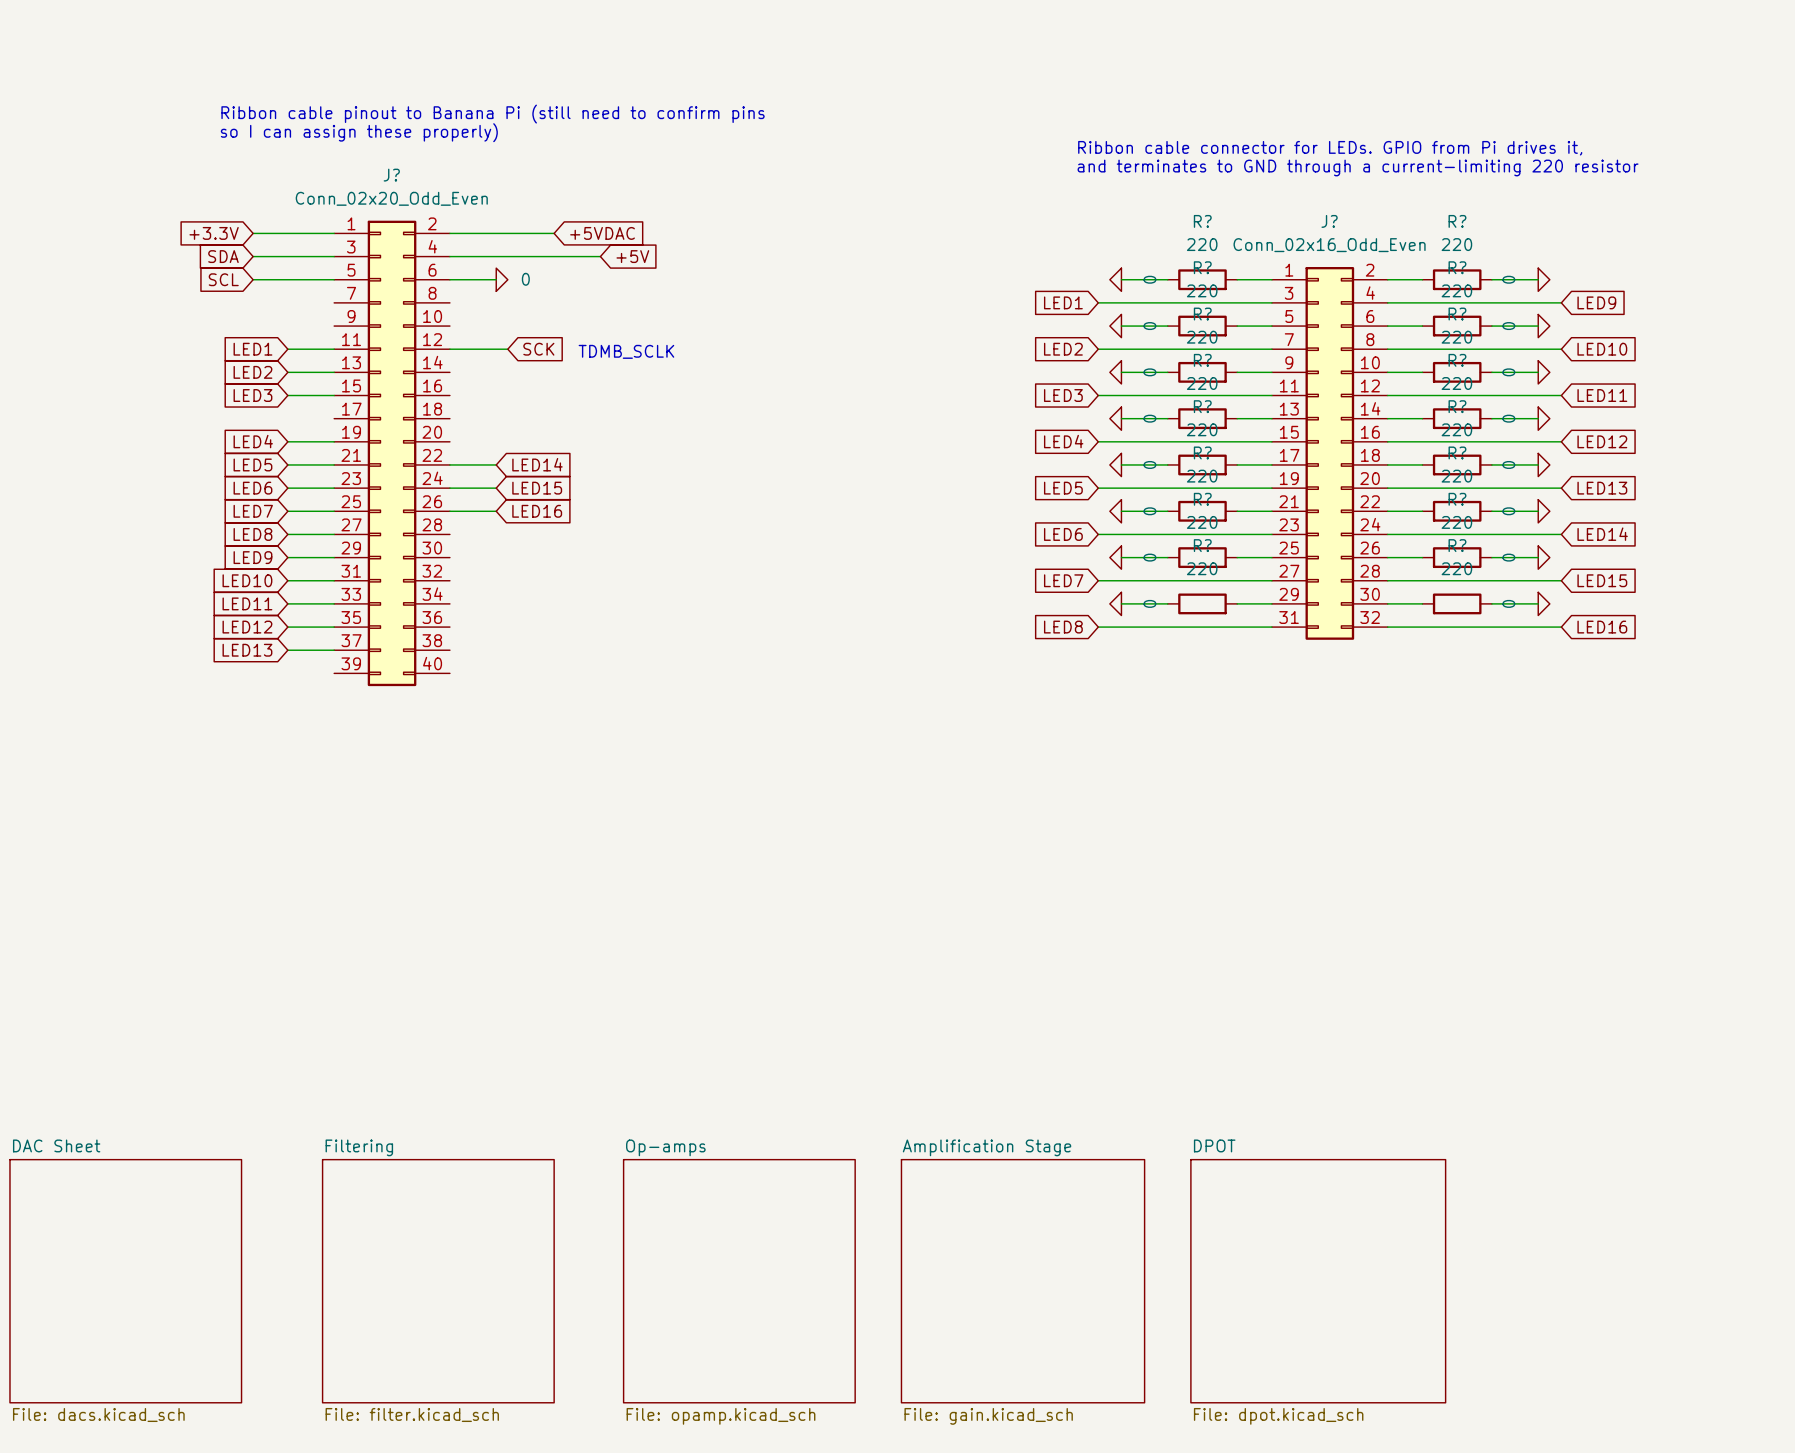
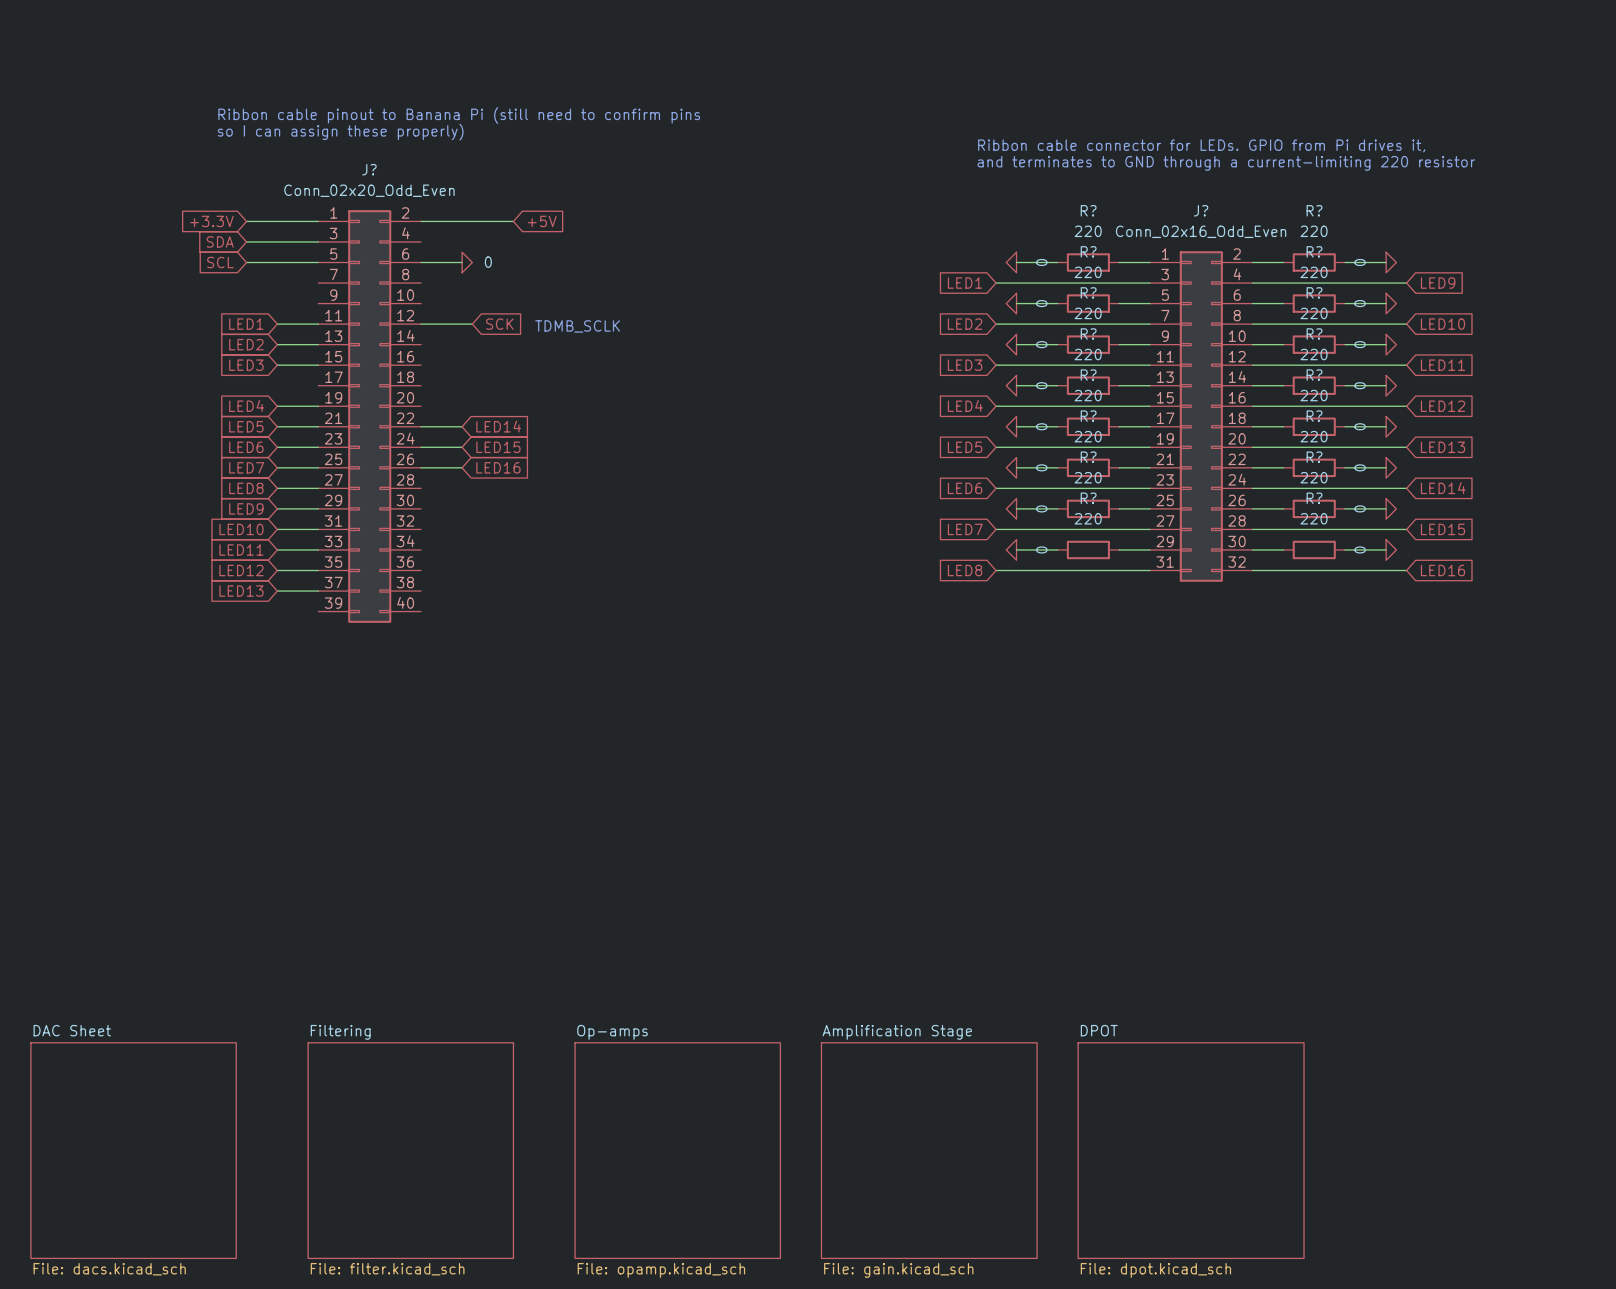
global label: +5VDAC (602, 233) -> +5V (542, 221)
wire: (449, 256) (600, 256) -> none
global label: +5V (632, 256) -> none

